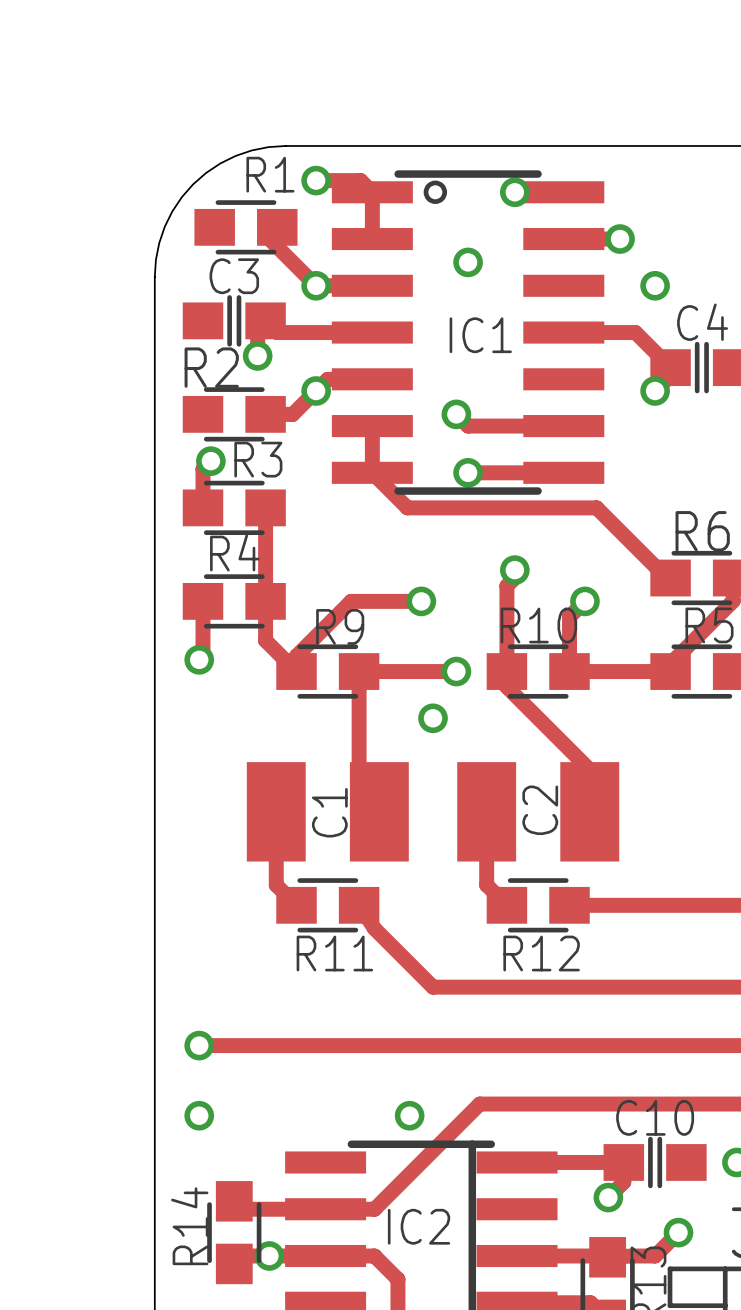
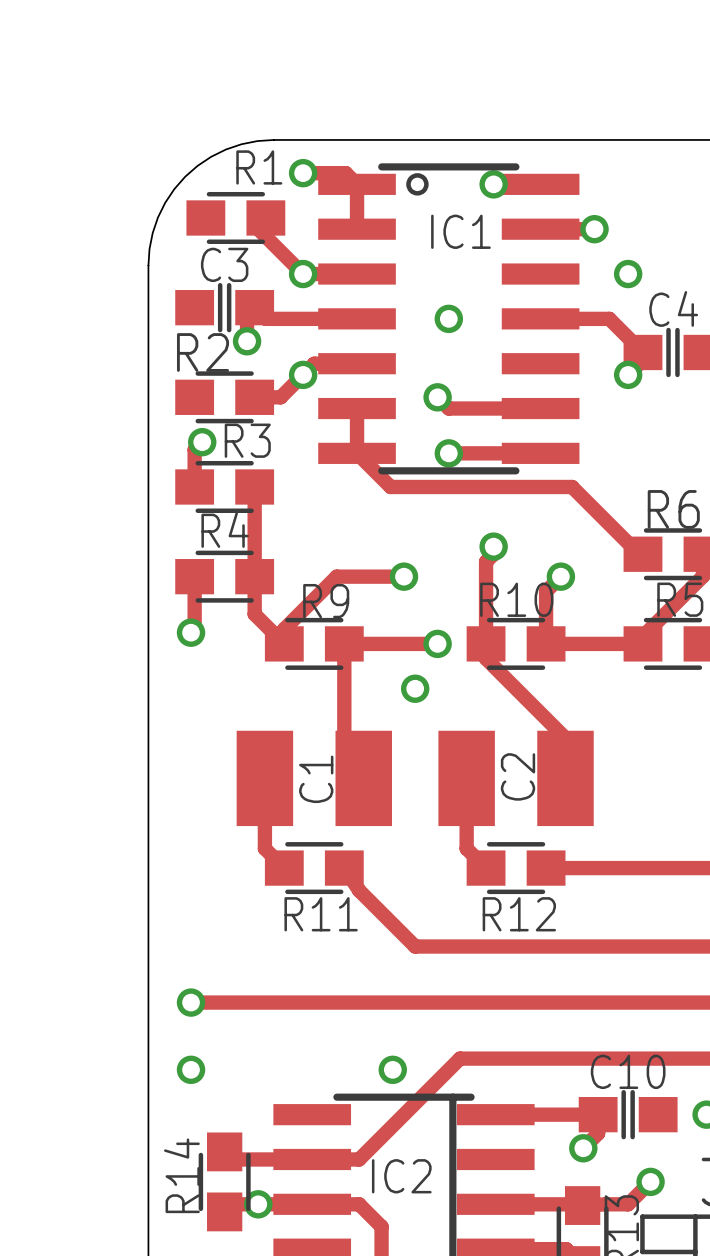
via position: (468, 262) -> (448, 318)
IC1 name position: IC1 (480, 335) -> IC1 (460, 231)

